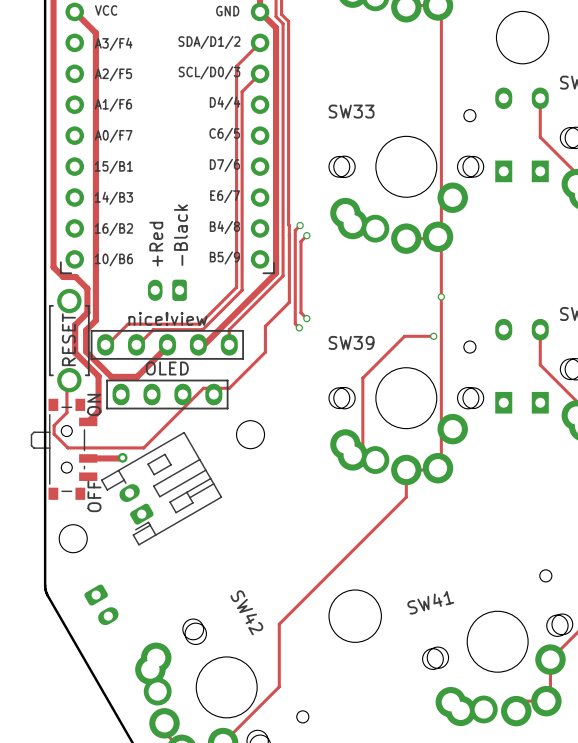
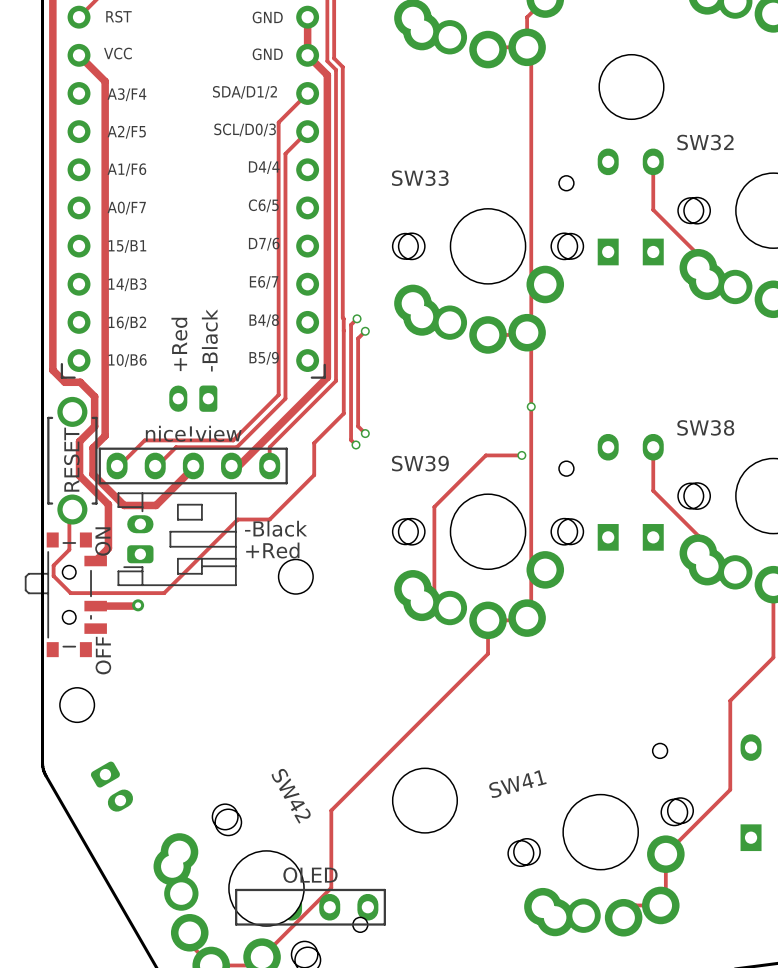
part: (167, 394) -> none
text: none -> -Black (276, 528)
part: none -> (177, 539)
text: none -> +Red (272, 550)
part: (161, 488) -> none
part: none -> (310, 907)

